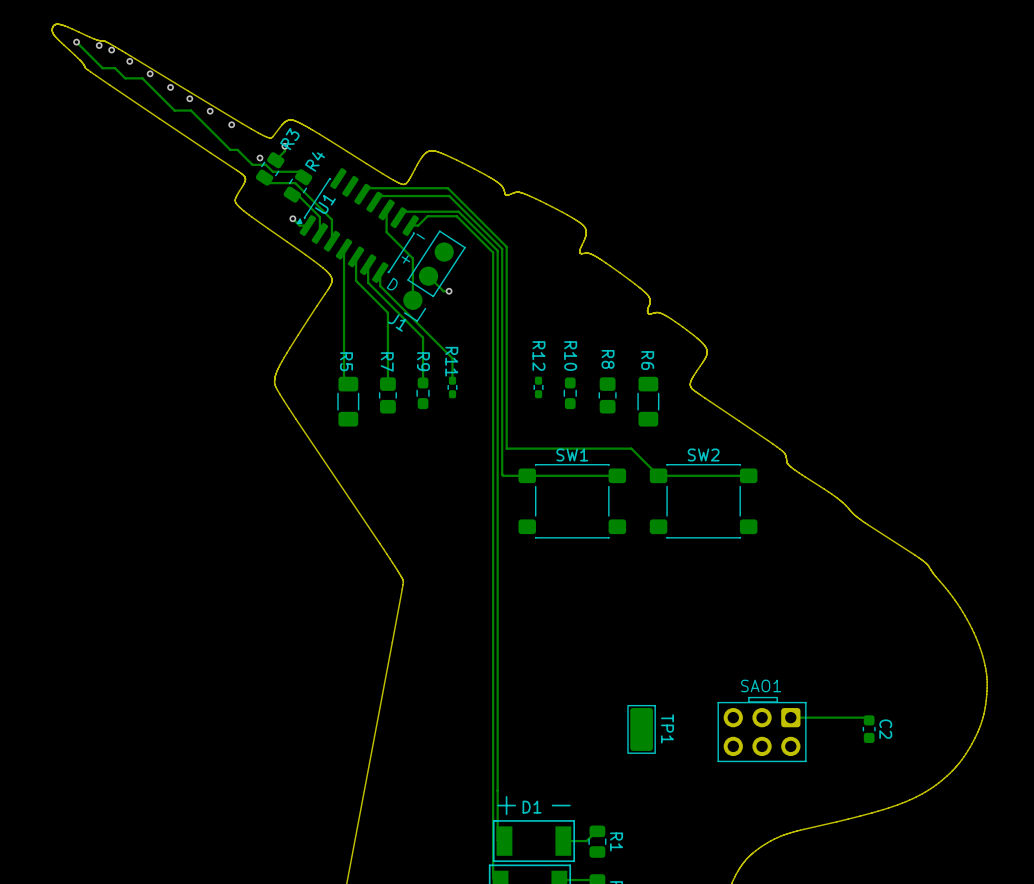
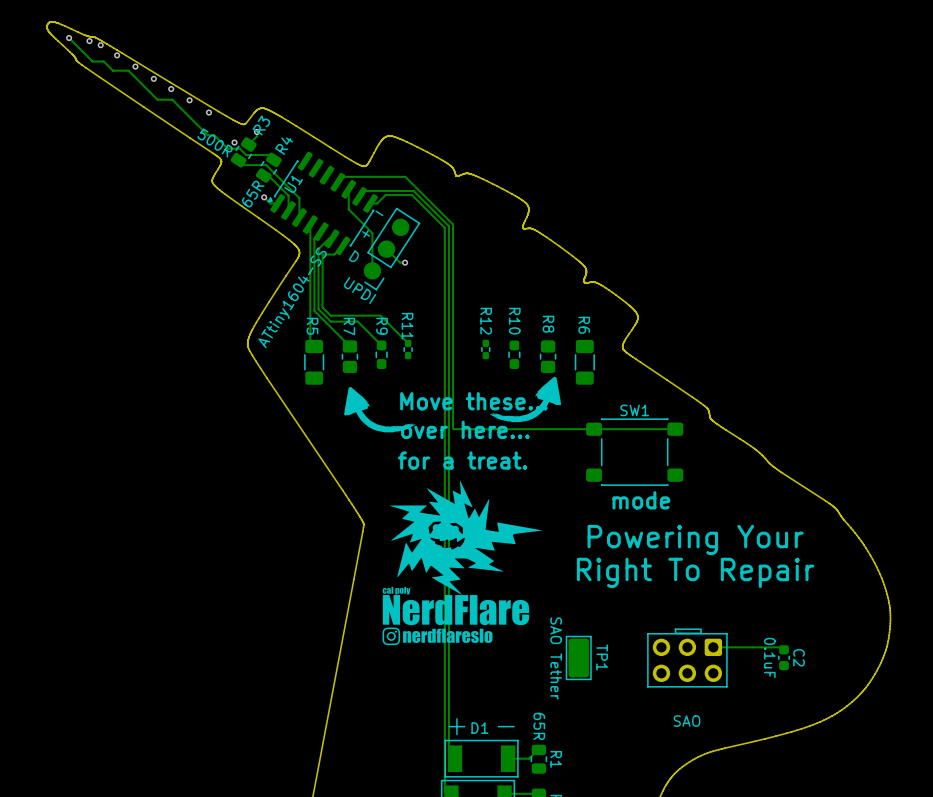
R3 value: none -> 500R (215, 143)
track: (362, 194) (368, 188) (447, 188) (506, 246) (506, 448) (631, 448) (658, 475) -> (556, 429) (594, 429)
R4 value: none -> 65R (253, 194)
track: (356, 257) (356, 280) (387, 312) (387, 384) -> (321, 232) (314, 239) (314, 310) (349, 346)
track: (368, 264) (368, 282) (423, 337) (423, 382) -> (332, 238) (328, 238) (318, 249) (318, 309) (330, 321) (357, 321) (381, 345)
track: (380, 272) (380, 286) (452, 358) (452, 380) -> (342, 245) (334, 254) (322, 254) (322, 307) (330, 315) (380, 315) (408, 343)
J1 name: J1 (397, 323) -> UPDI (360, 290)
U1 value: none -> ATtiny1604-SS (292, 297)
drawing: none -> [489, 376, 562, 423]
drawing: none -> [344, 386, 416, 433]
text: none -> Move these... (473, 401)
SW2 name: SW2 (703, 454) -> SW1 (634, 410)
text: none -> over here... (465, 429)
SW1: (572, 501) -> none
text: none -> for a treat. (462, 460)
drawing: none -> [382, 480, 543, 646]
text: none -> mode (641, 500)
text: none -> Powering Your (695, 539)
text: none -> Right To Repair (695, 572)
SAO1 name: SAO1 (761, 685) -> none
TP1 value: none -> SAO Tether (556, 658)
C2 value: none -> 0.1uF (769, 657)
SAO1 text: none -> SAO (687, 721)
R1 value: none -> 65R (539, 726)

